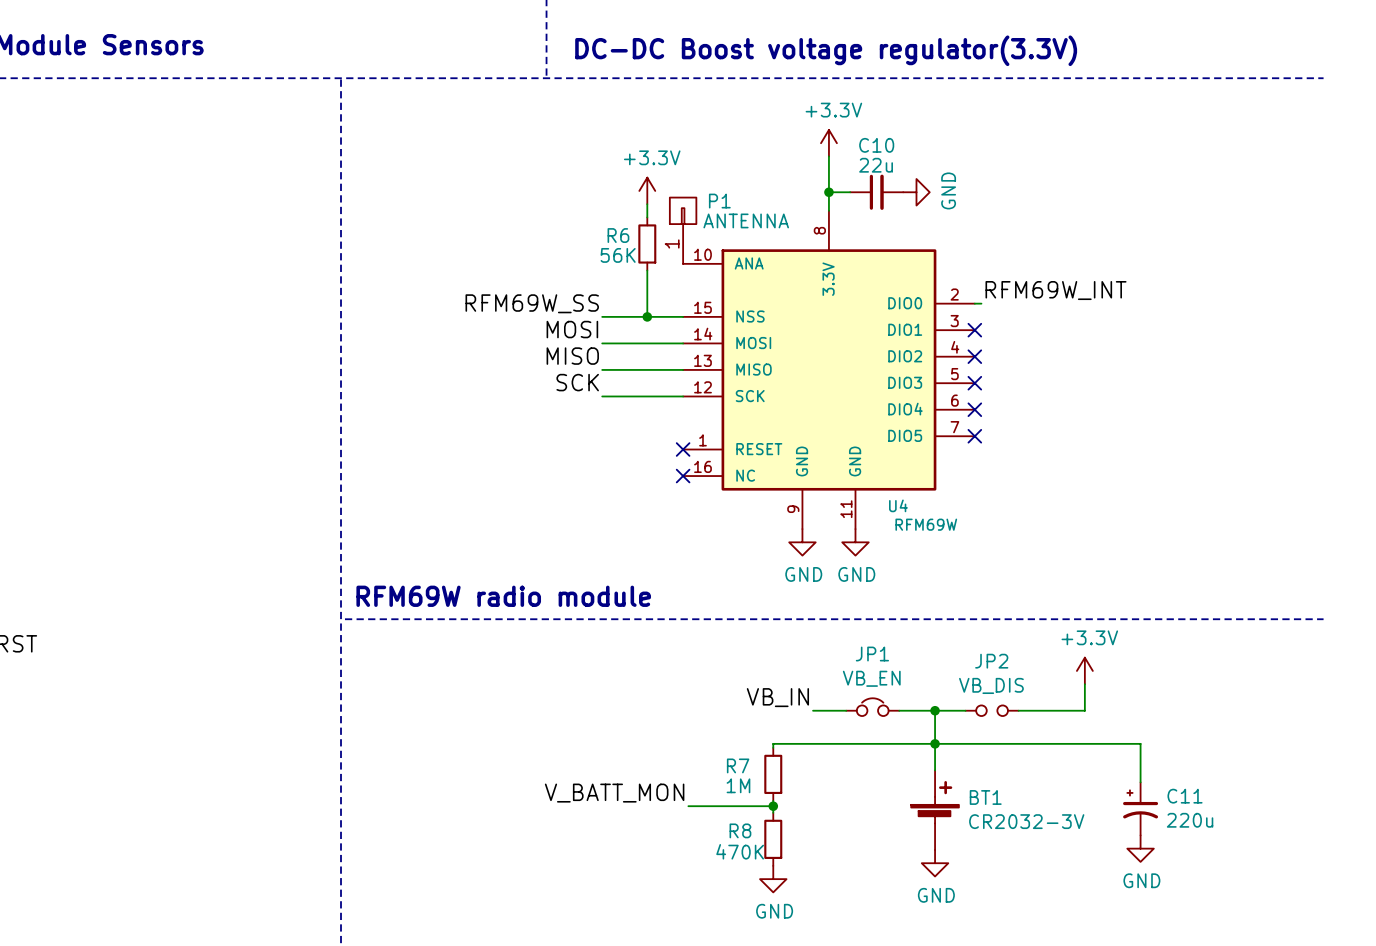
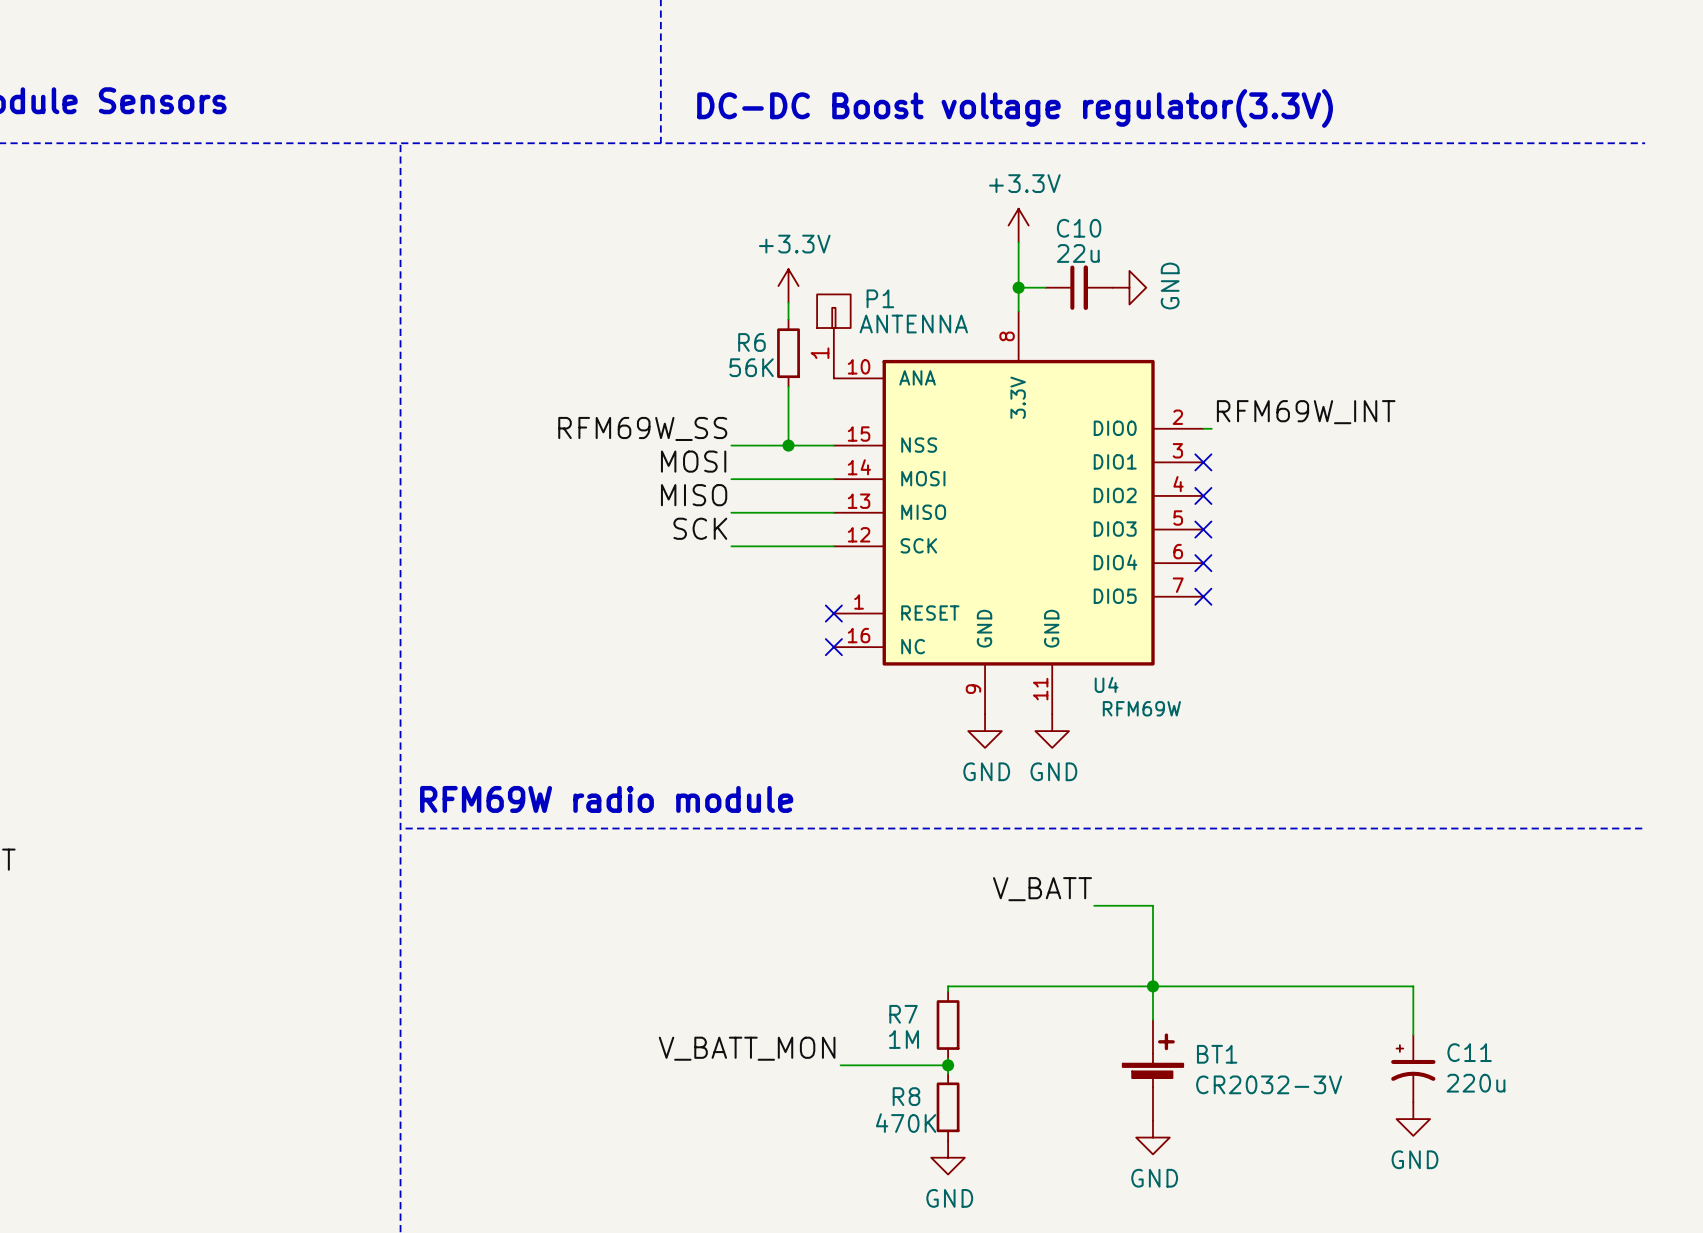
label: none -> V_BATT (1042, 889)
power symbol: +3.3V (1084, 670) -> none
wire: none -> (1094, 905) (1152, 905) (1152, 944)
wire: (1084, 684) (1084, 710) (1018, 710) -> none
label: VB_IN (777, 697) -> none
JP1: VB_EN (872, 707) -> none
wire: (813, 710) (846, 710) -> none
wire: (899, 710) (965, 710) -> none
junction: (935, 710) -> none
JP2: VB_DIS (992, 710) -> none

